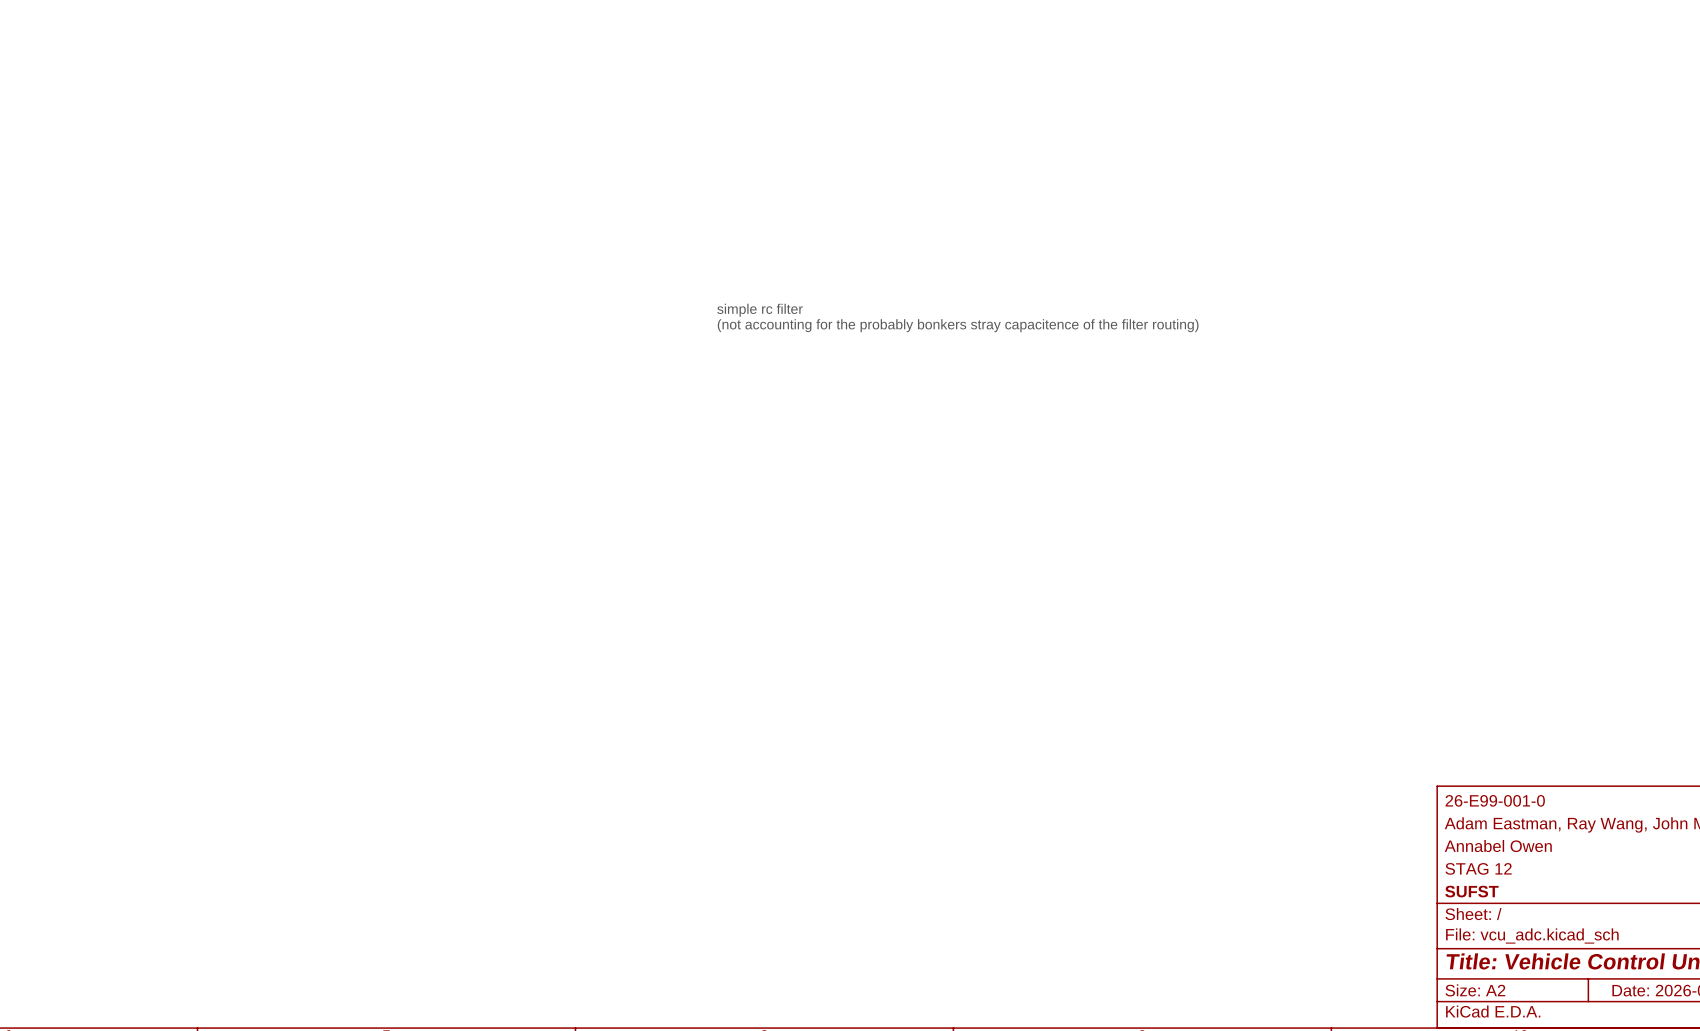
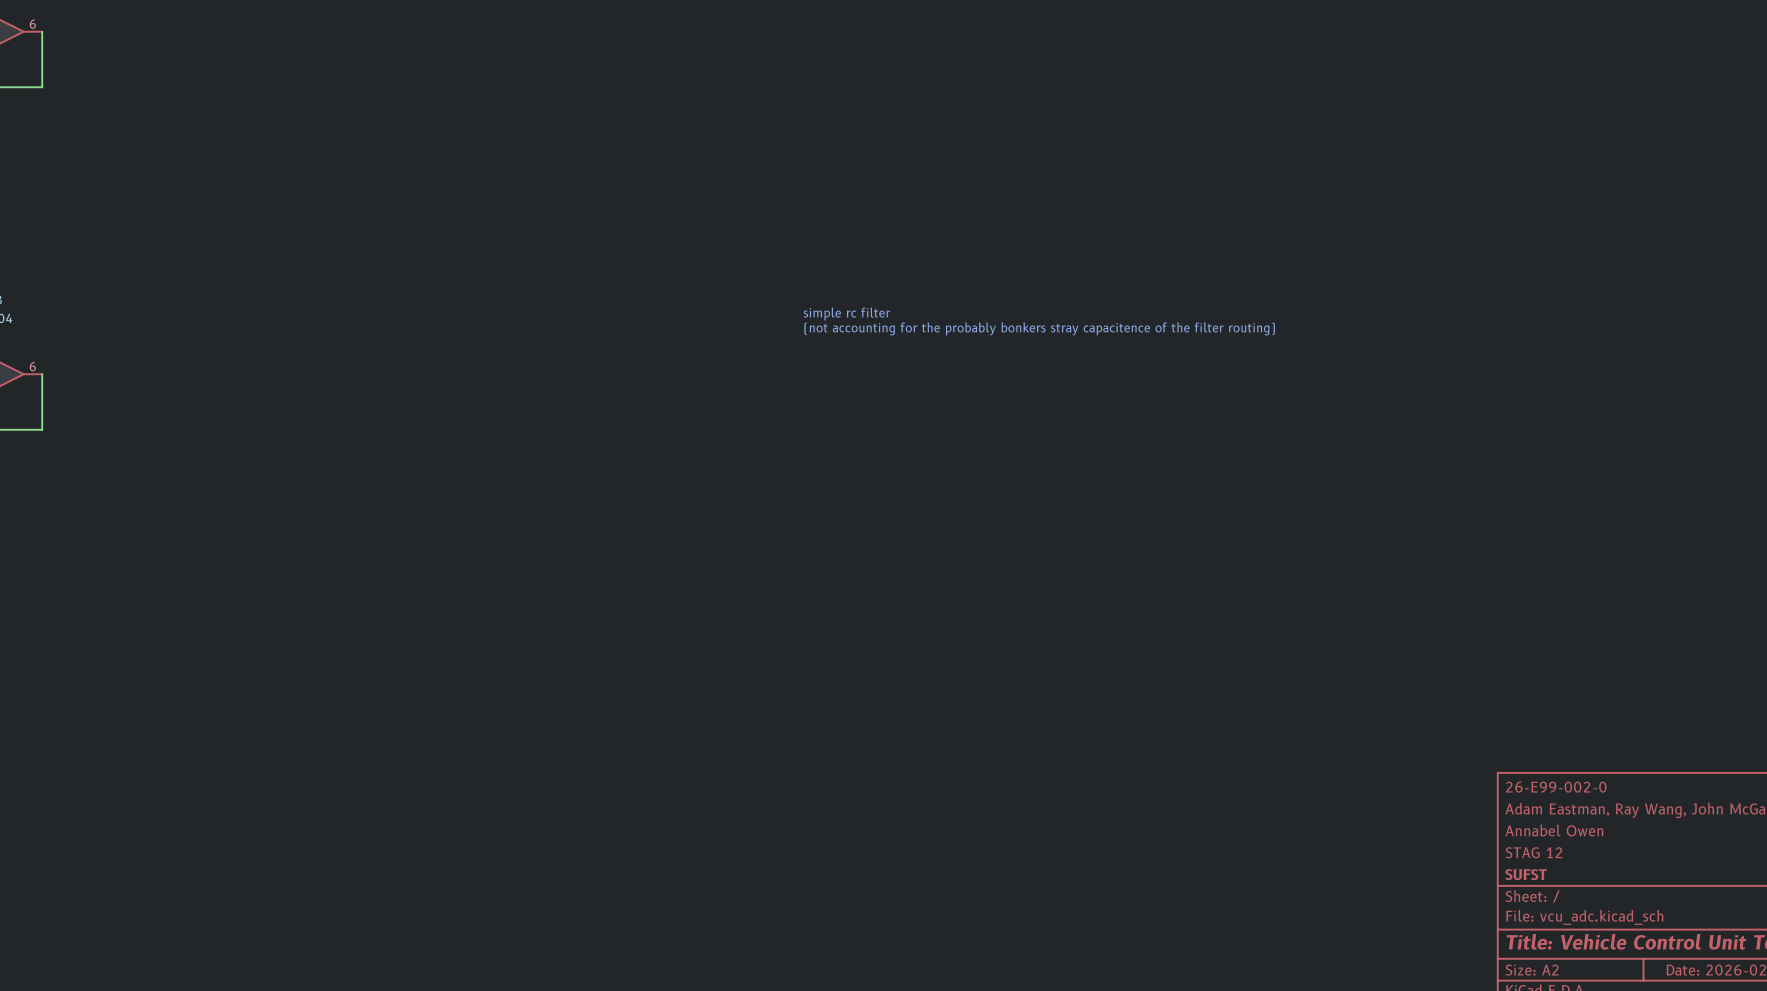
title block: 26-E99-001-0 (1495, 800) -> 26-E99-002-0 (1556, 787)

